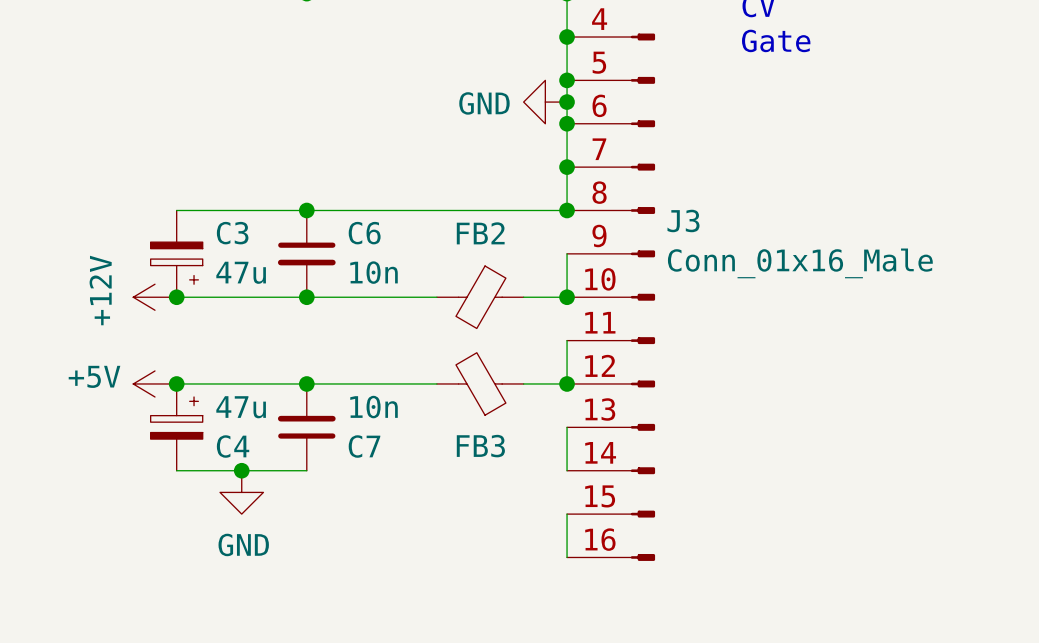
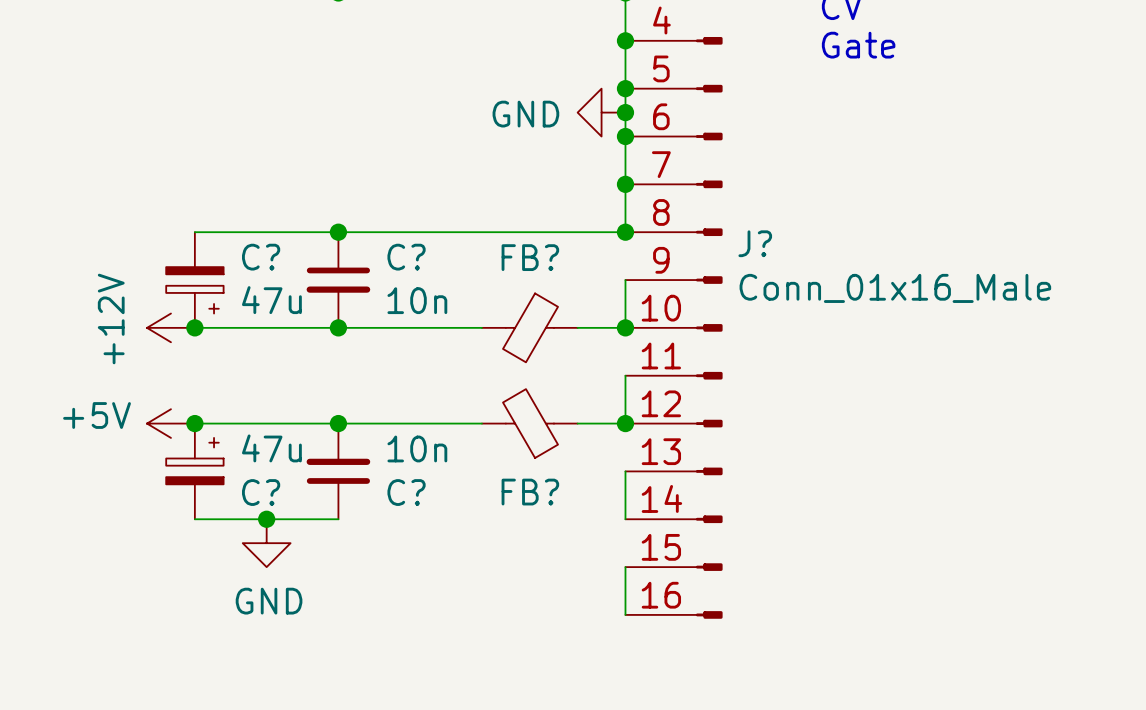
J3 name: J3 (683, 220) -> J? (755, 243)
C3 name: C3 (232, 233) -> C? (261, 257)
C6 name: C6 (364, 233) -> C? (406, 257)
FB2 name: FB2 (480, 233) -> FB? (530, 257)
C4 name: C4 (233, 446) -> C? (261, 492)
C7 name: C7 (364, 446) -> C? (406, 492)
FB3 name: FB3 (480, 446) -> FB? (530, 492)

